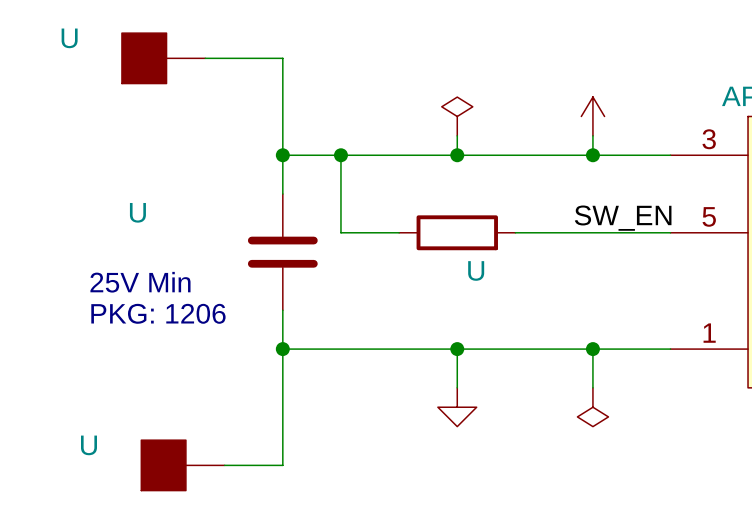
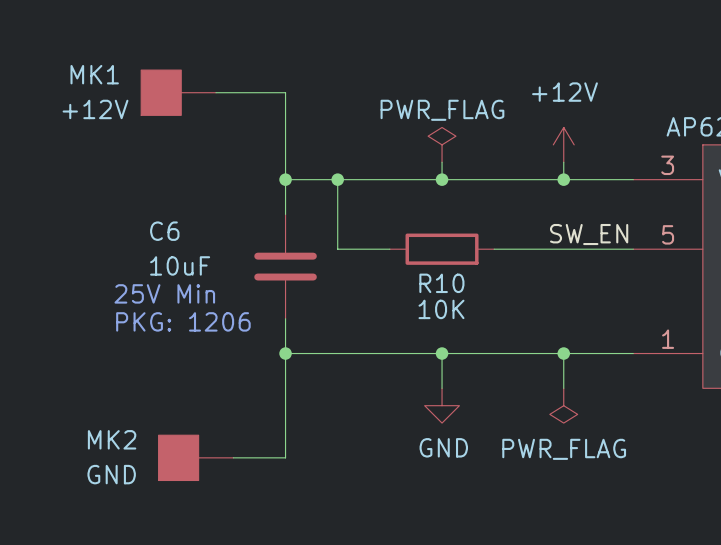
U name: U (69, 38) -> MK1 (94, 74)
power symbol text: none -> +12V (564, 92)
U value: none -> +12V (95, 109)
power symbol text: none -> PWR_FLAG (442, 110)
U name: U (137, 212) -> C6 (164, 231)
U value: none -> 10uF (180, 265)
U name: U (476, 270) -> R10 (441, 283)
U value: none -> 10K (441, 309)
U name: U (88, 445) -> MK2 (112, 439)
power symbol text: none -> GND (443, 447)
power symbol text: none -> PWR_FLAG (564, 449)
U value: none -> GND (111, 474)

